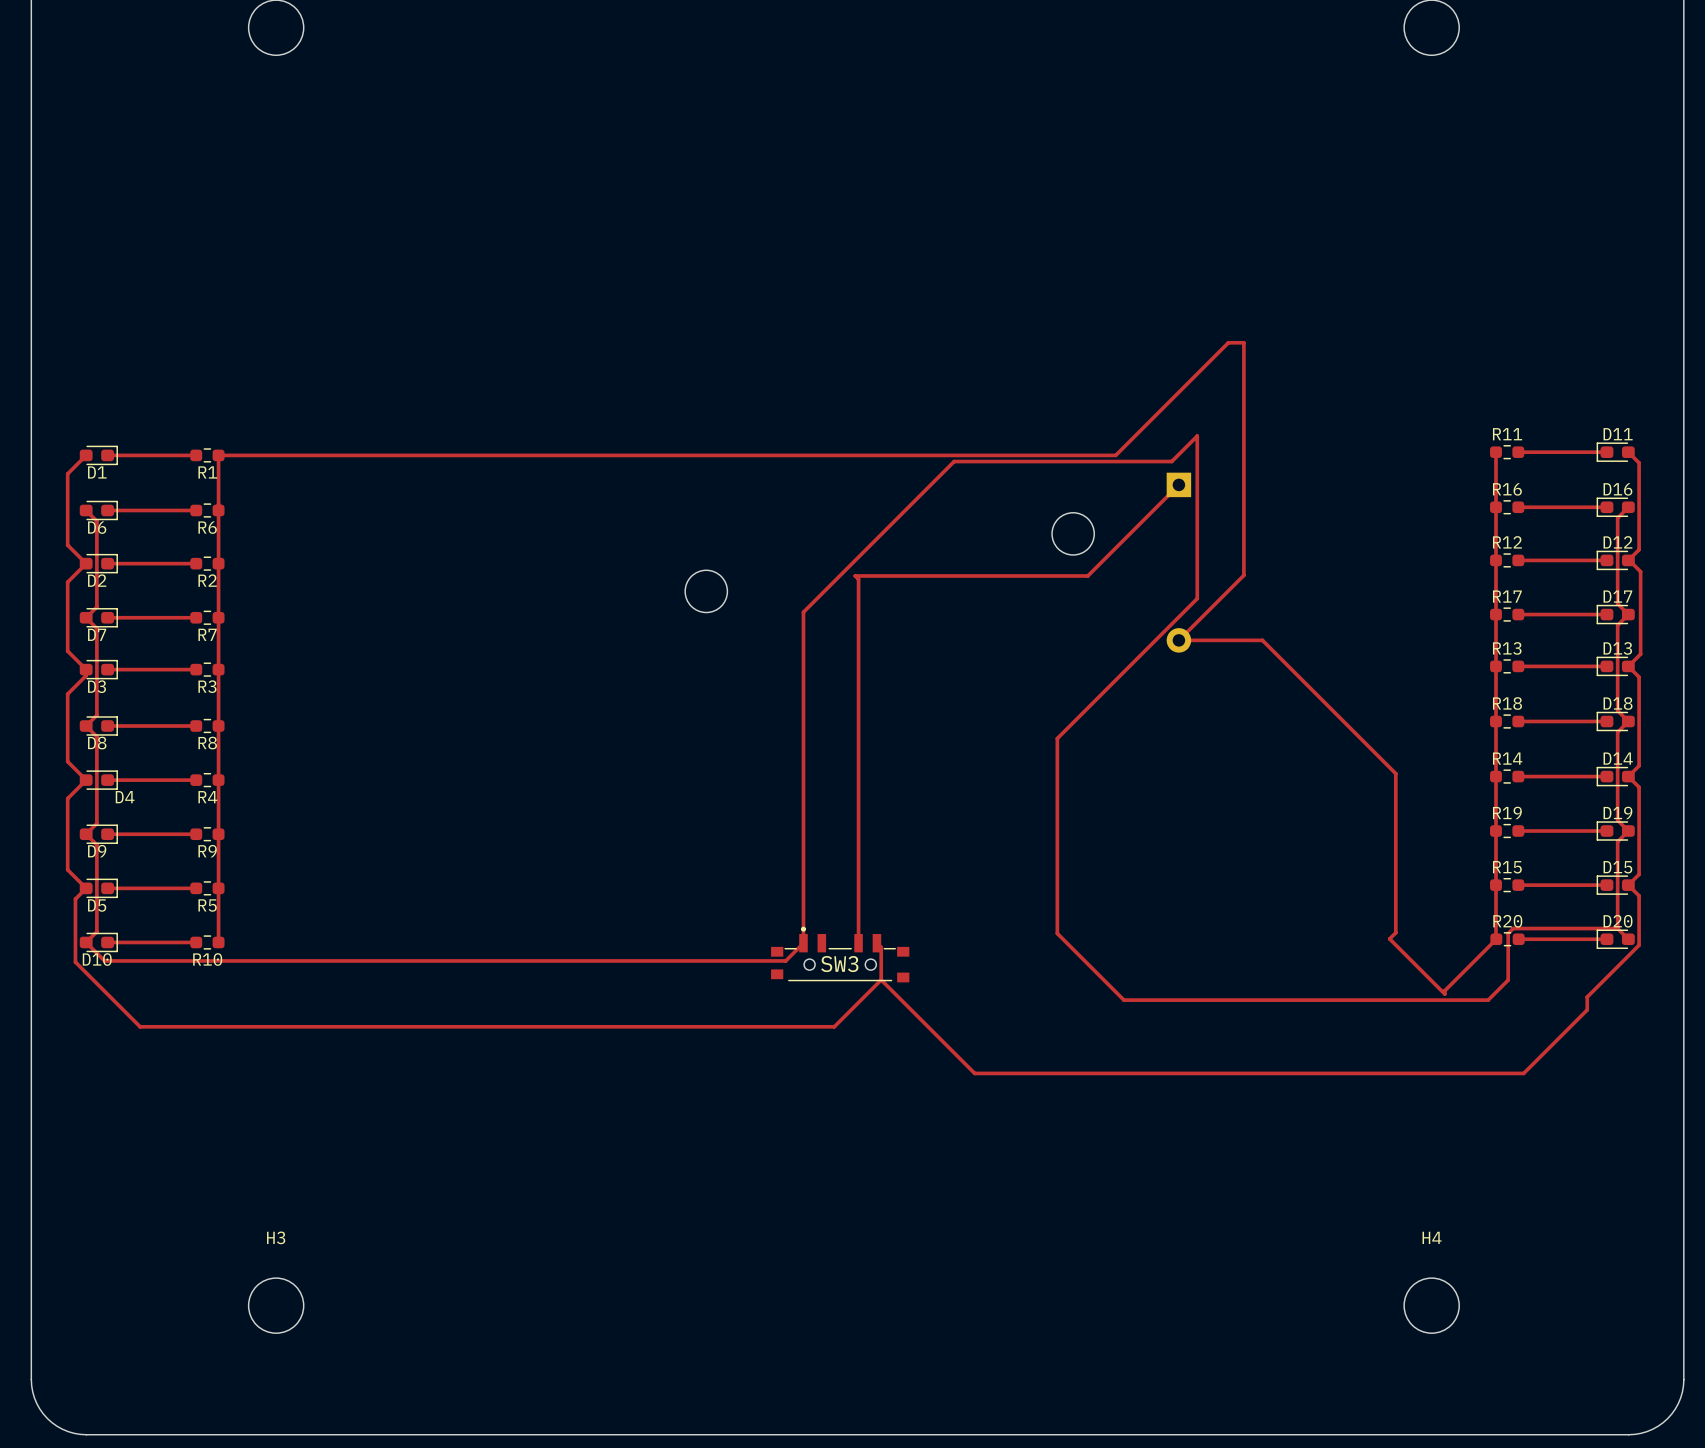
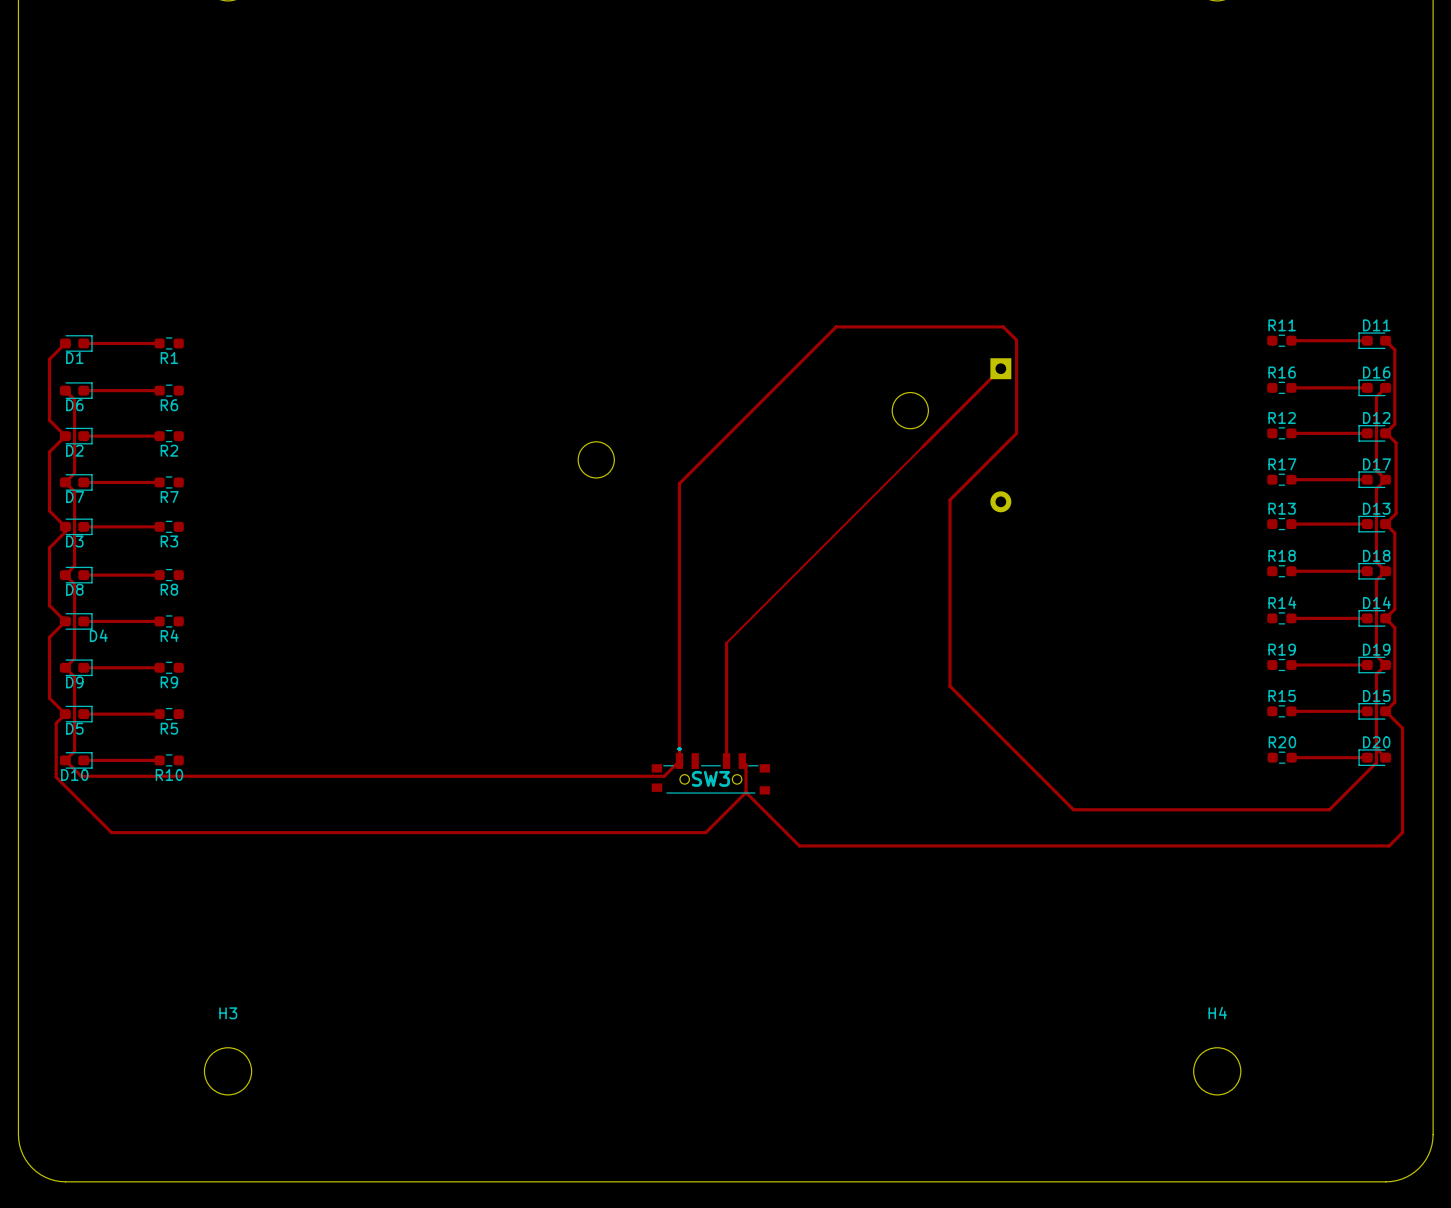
top track: (1197, 451) (1197, 436) (1171, 461) (954, 461) (803, 612) (803, 619) -> (1016, 340) (1003, 326) (836, 326) (679, 483)
top track: (1496, 452) (1496, 939) (1444, 990) (1444, 994) (1389, 938) (1395, 932) (1395, 773) (1262, 640) (1178, 640) (1243, 575) (1243, 342) (1228, 342) (1115, 455) (218, 455) (218, 942) -> none
top track: (1197, 560) (1197, 598) (1057, 738) (1057, 933) (1123, 1000) (1263, 1000) -> (1016, 433) (950, 499) (950, 686) (1073, 809)
top track: (1087, 575) (855, 575) (858, 579) (858, 805) -> (922, 446) (726, 642)
top track: (1639, 895) (1639, 945) (1587, 997) (1587, 1009) (1523, 1073) (974, 1073) (943, 1042) -> (1394, 720) (1402, 728) (1402, 832) (1389, 845) (799, 845)
top track: (1617, 928) (1513, 928) (1508, 933) (1508, 980) (1488, 1000) -> (1376, 748) (1376, 762) (1329, 809) (1265, 809)

